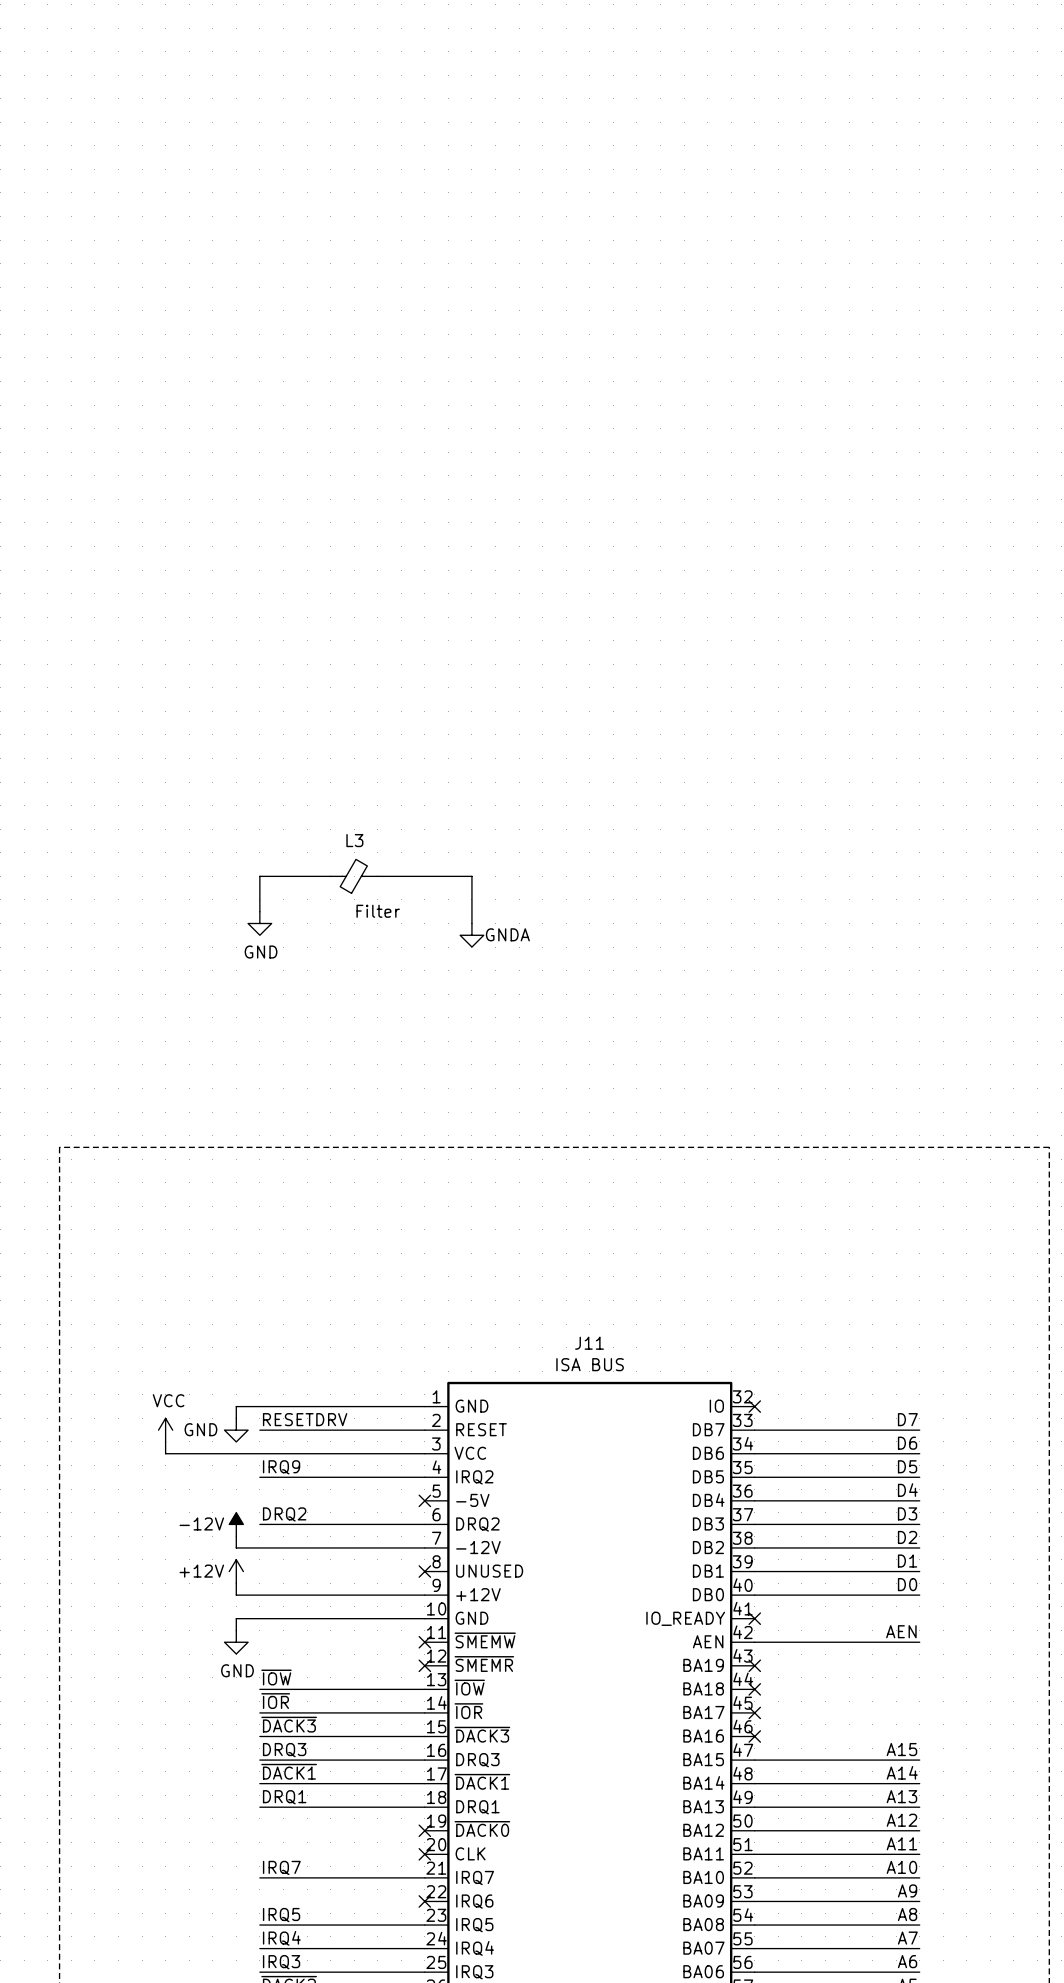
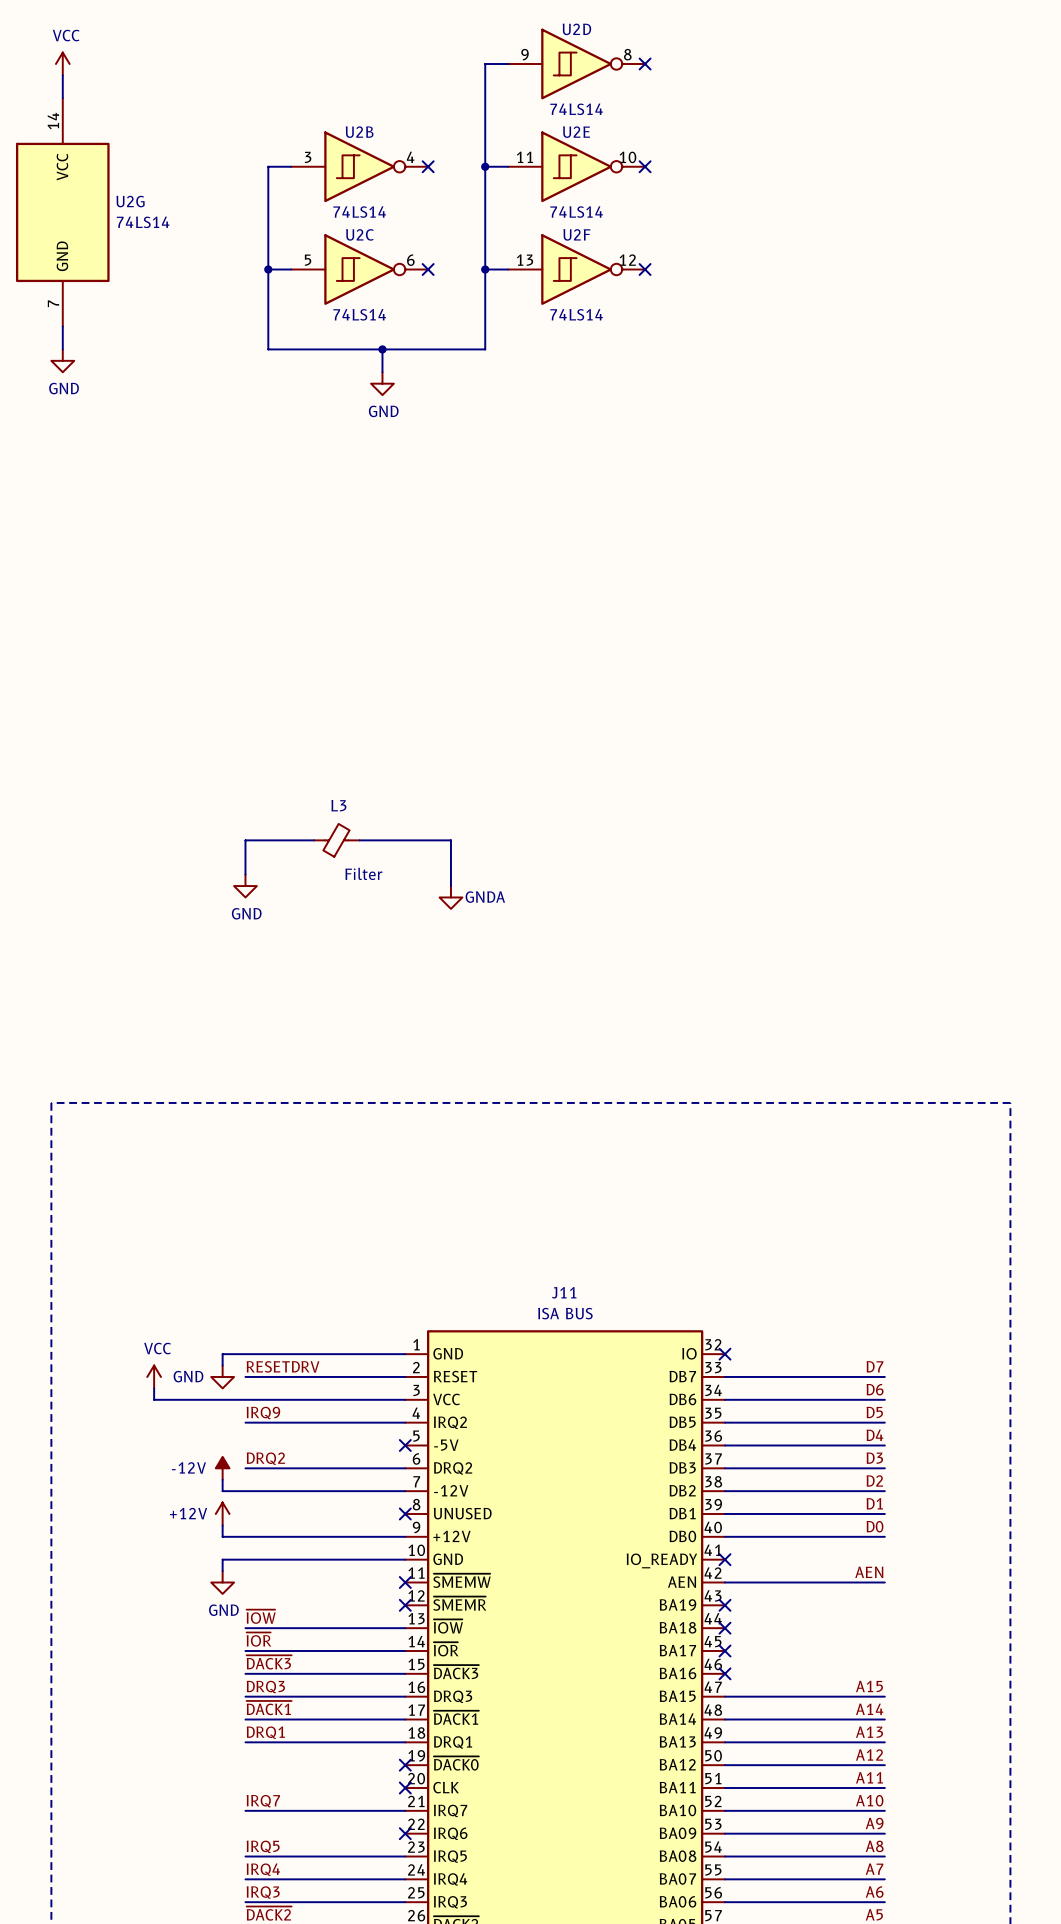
power symbol: none -> VCC (62, 64)
wire: none -> (508, 64) (485, 64) (485, 349) (268, 349) (268, 166) (291, 166)
U2D: none -> 74LS14 (576, 64)
no-connect mark: none -> (645, 64)
wire: none -> (62, 75) (62, 98)
U2B: none -> 74LS14 (359, 166)
no-connect mark: none -> (428, 166)
wire: none -> (485, 166) (508, 166)
junction: none -> (485, 166)
U2E: none -> 74LS14 (576, 166)
no-connect mark: none -> (645, 166)
U2G: none -> 74LS14 (62, 212)
wire: none -> (268, 269) (291, 269)
junction: none -> (268, 269)
U2C: none -> 74LS14 (359, 269)
no-connect mark: none -> (428, 269)
wire: none -> (485, 269) (508, 269)
junction: none -> (485, 269)
U2F: none -> 74LS14 (576, 269)
no-connect mark: none -> (645, 269)
wire: none -> (62, 326) (62, 349)
wire: none -> (382, 349) (382, 372)
junction: none -> (382, 349)
power symbol: none -> GND (62, 360)
power symbol: none -> GND (382, 383)

